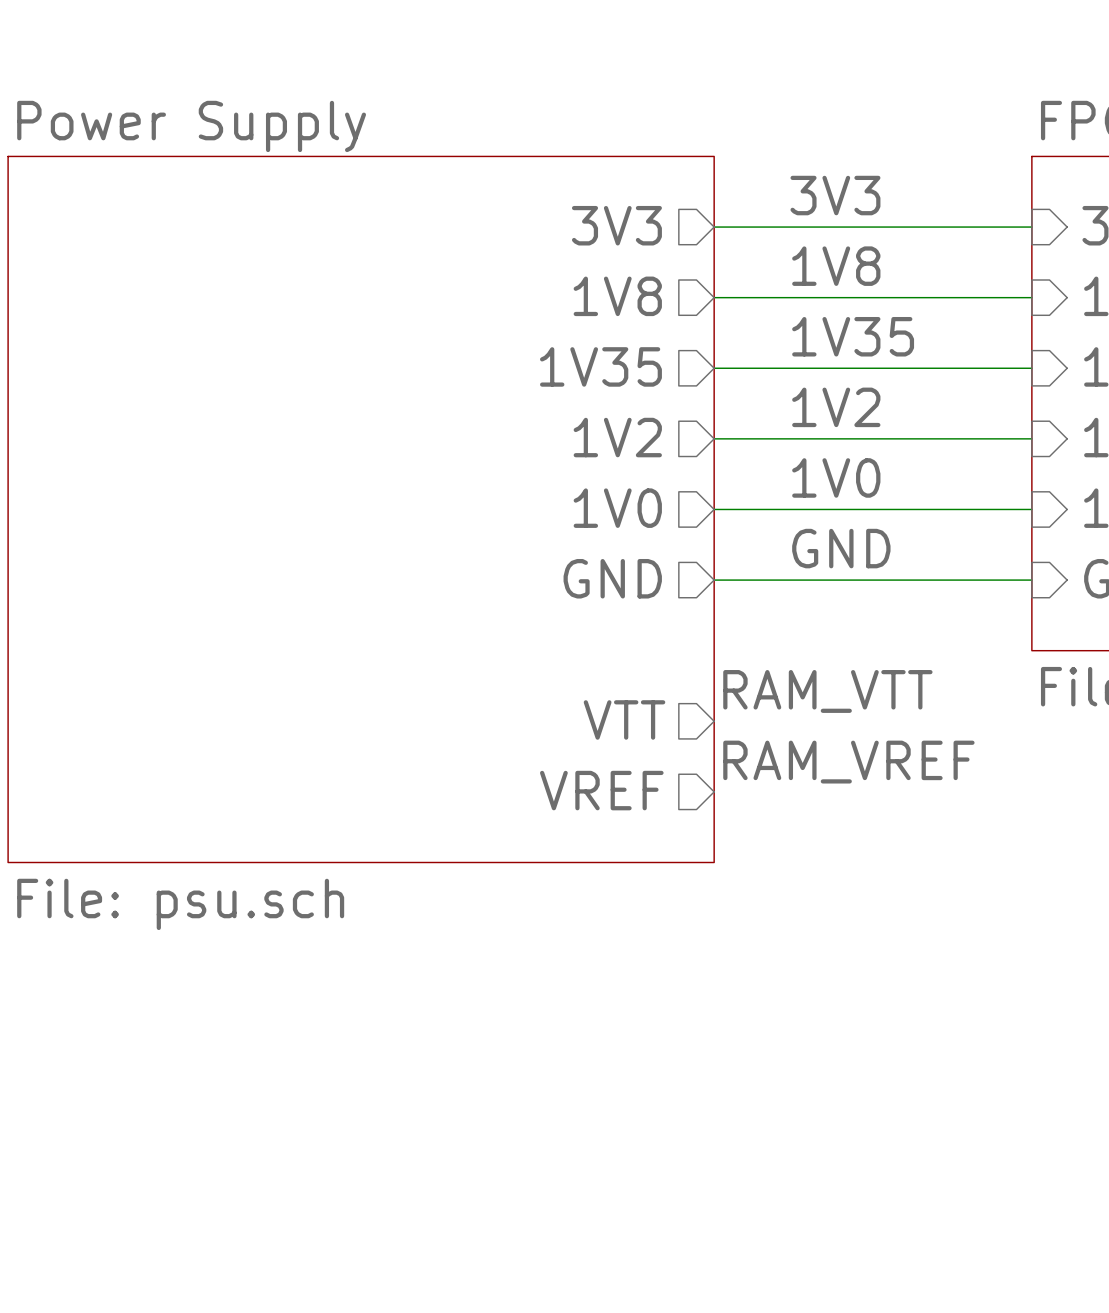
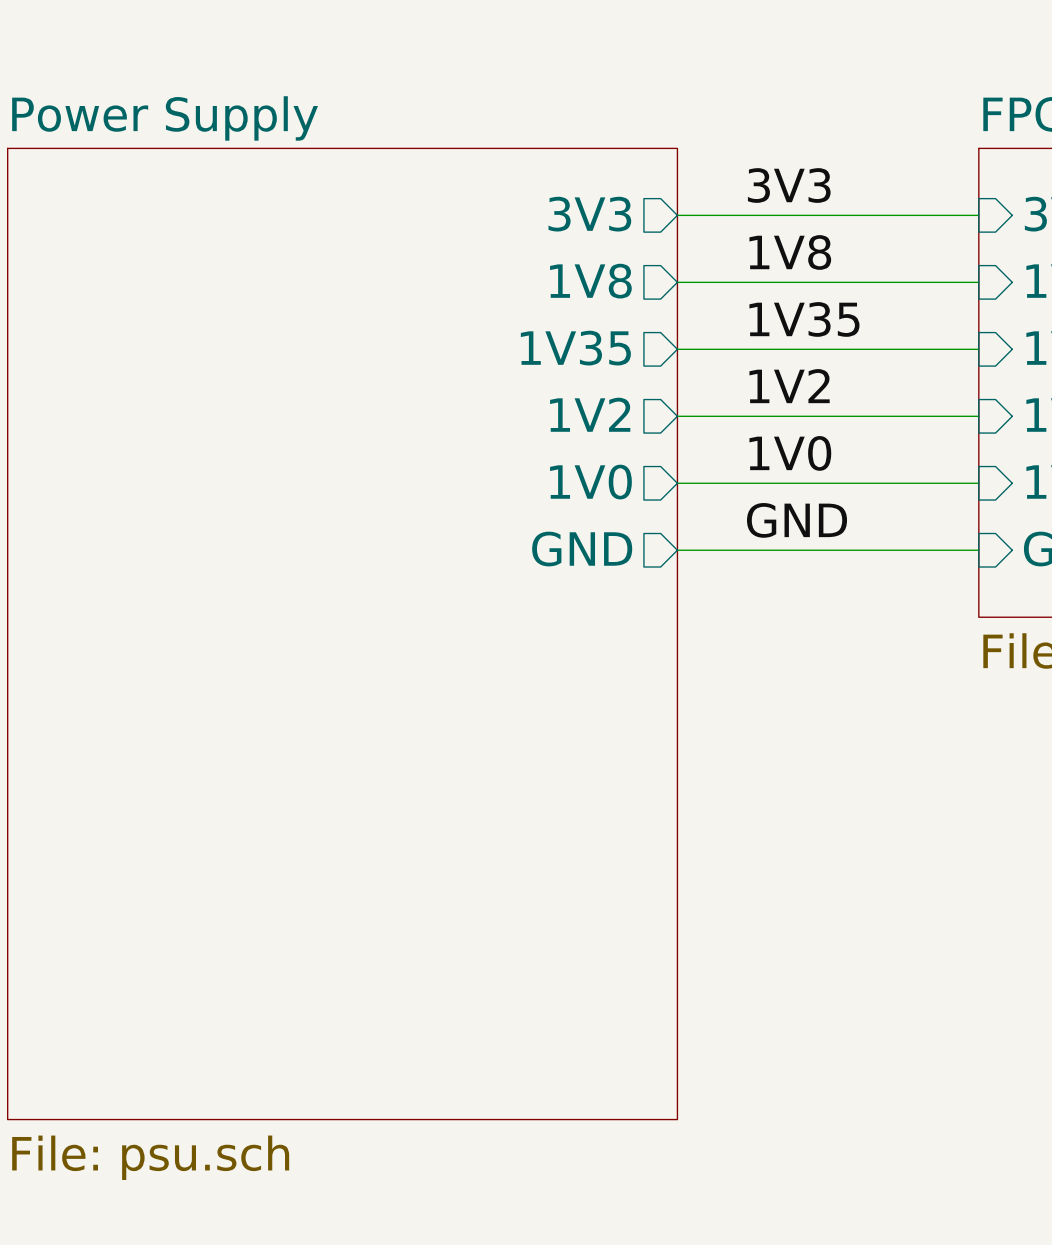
sheet Power Supply: File: psu.sch (361, 509) -> none
sheet Power Supply: none -> File: psu.sch (342, 633)
label: RAM_VTT (827, 691) -> none
sheet pin: VTT (624, 719) -> none
label: RAM_VREF (848, 762) -> none
sheet pin: VREF (601, 790) -> none

